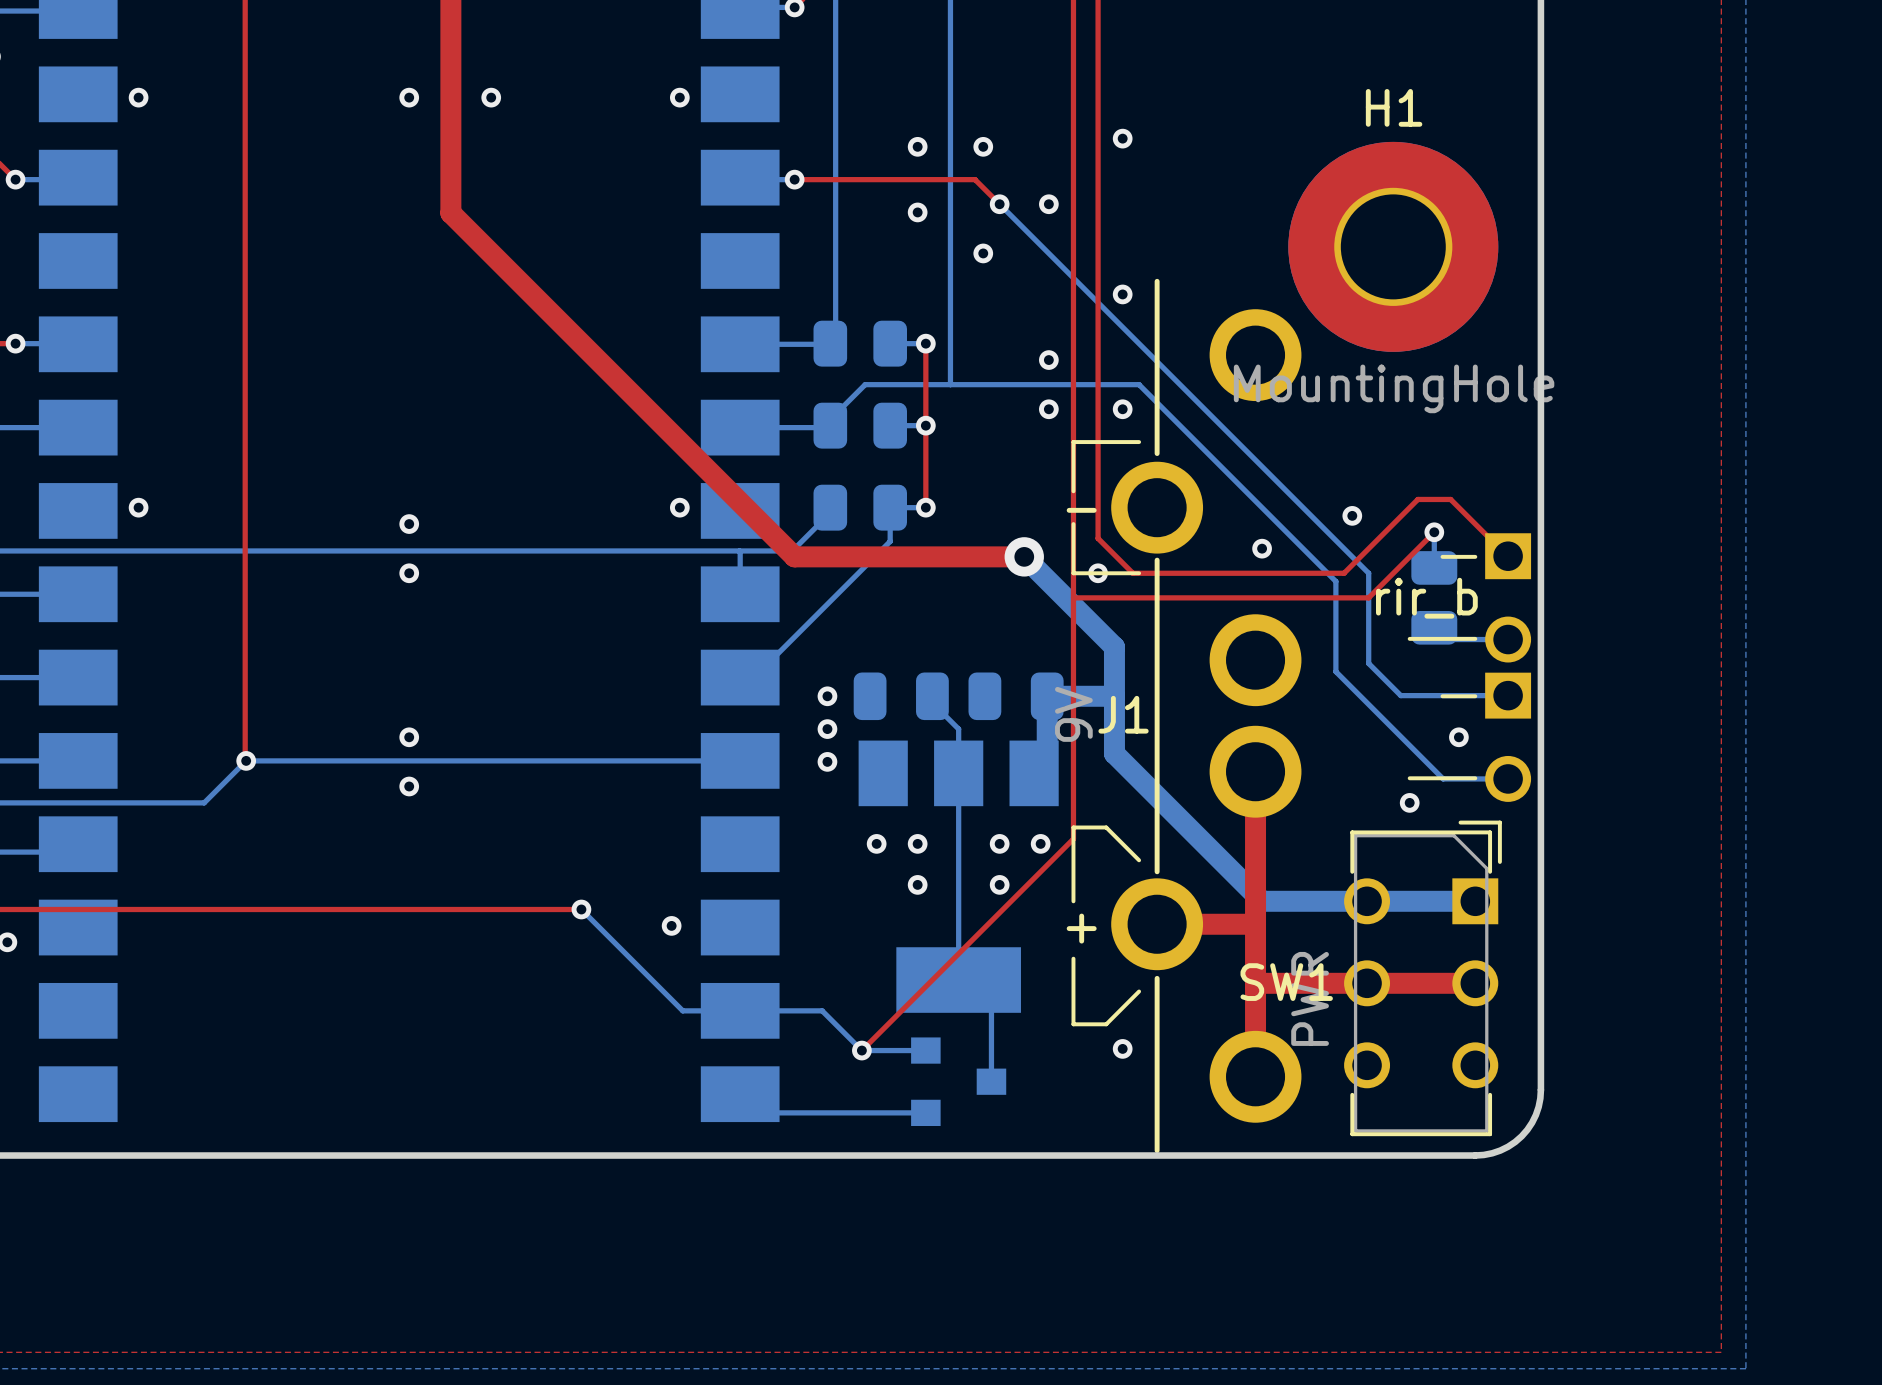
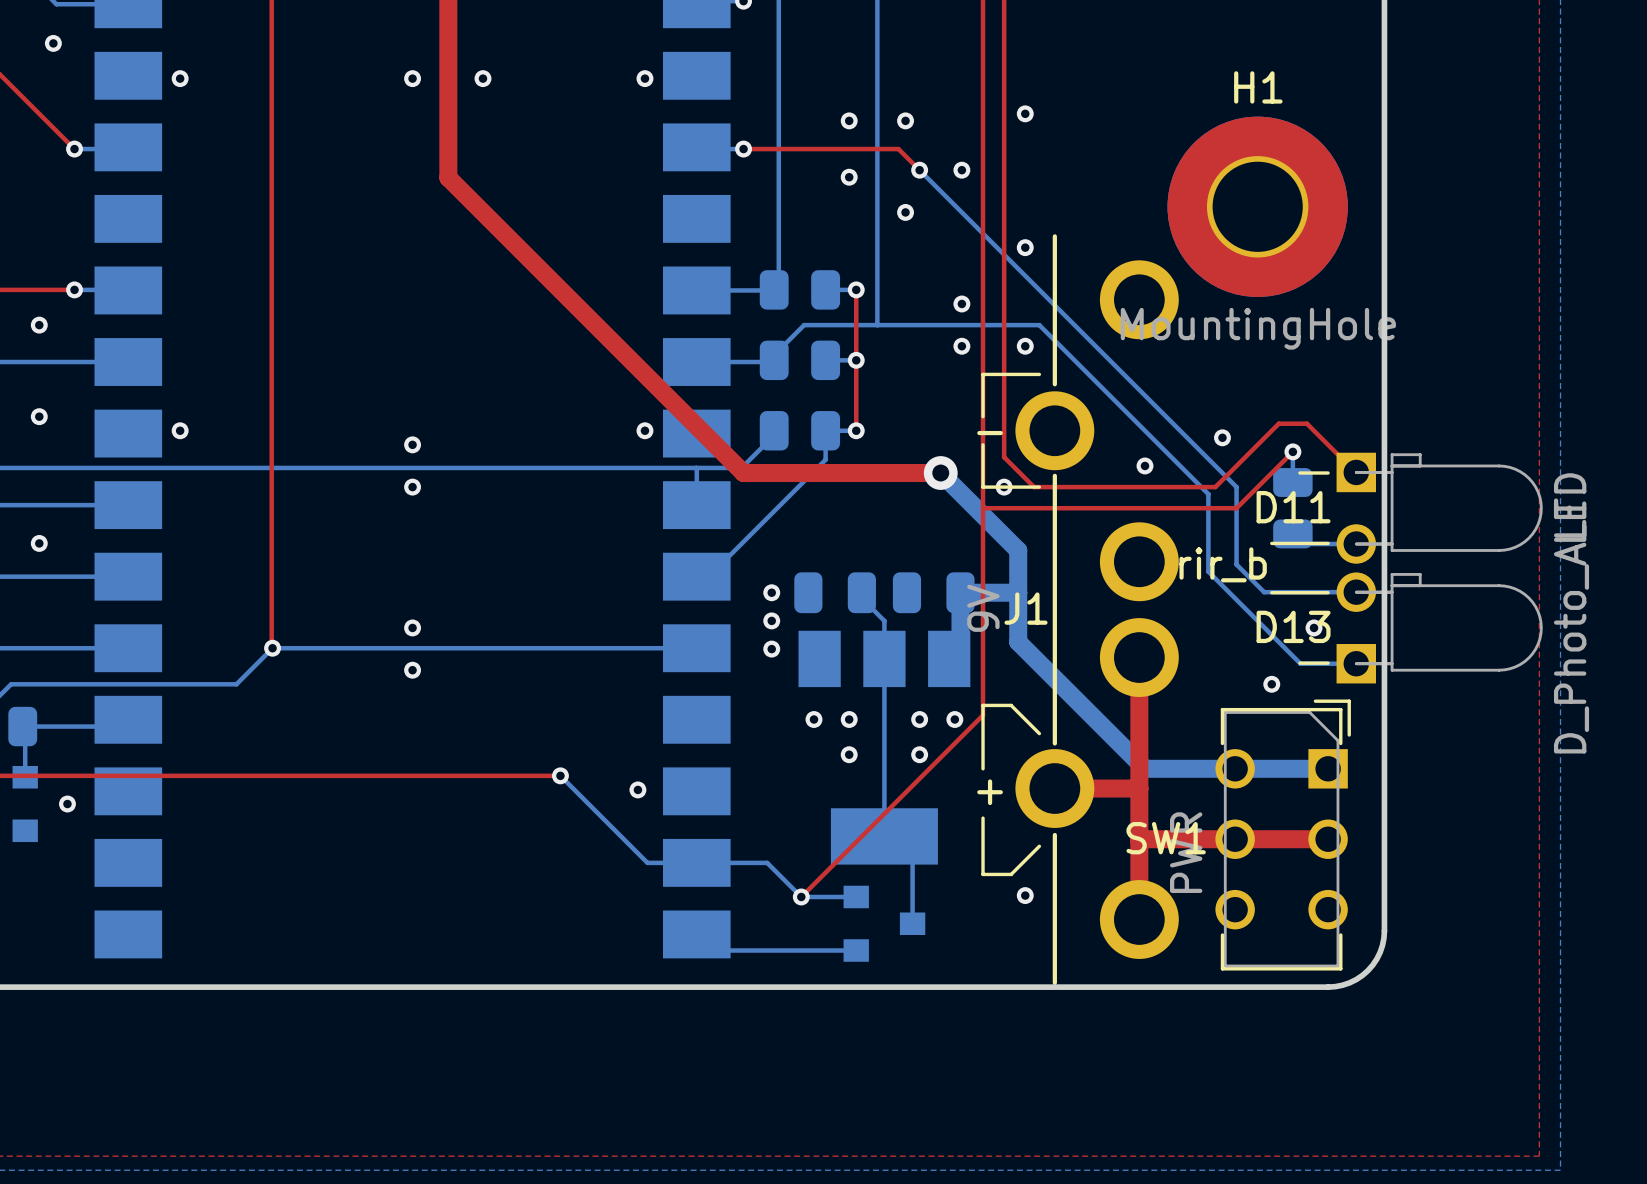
D11 side: bottom (1508, 597) -> top (1439, 508)
text position: rir_b (1426, 598) -> rir_b (1223, 564)
D13 side: bottom (1508, 737) -> top (1439, 627)
line: (1409, 778) (1442, 778) -> (1271, 592) (1299, 592)

